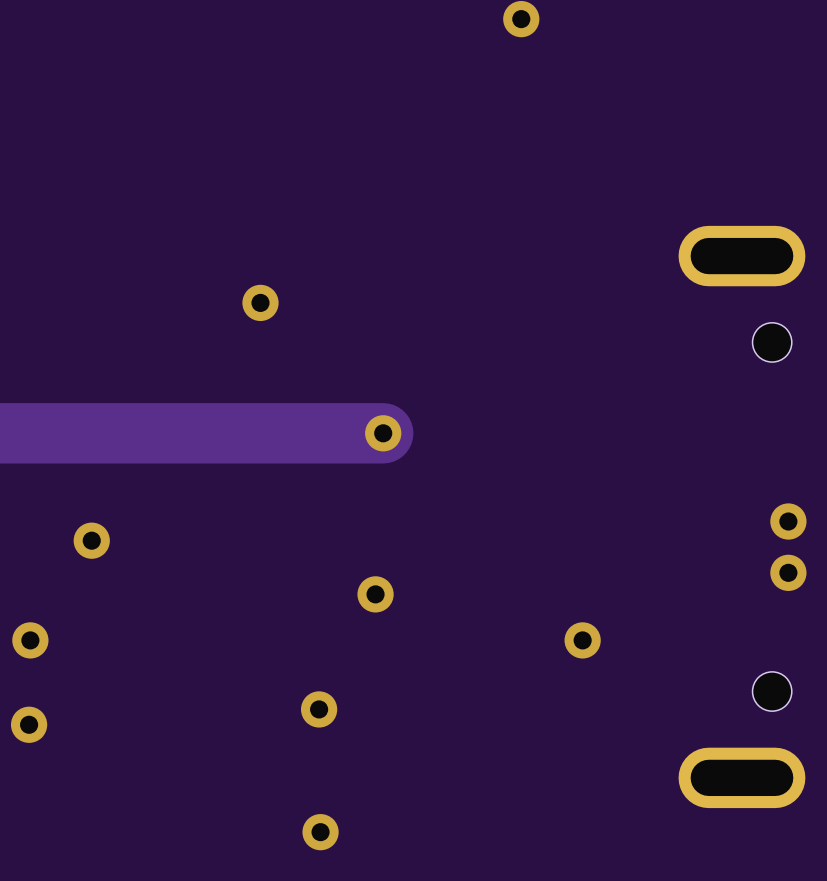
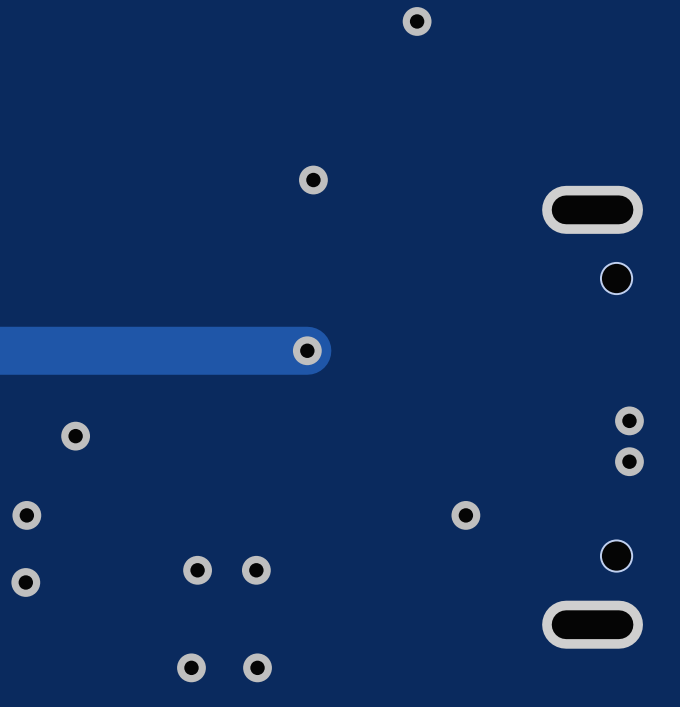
via position: (260, 302) -> (313, 180)
via: (375, 594) -> none
via: none -> (197, 570)
via: none -> (191, 667)

